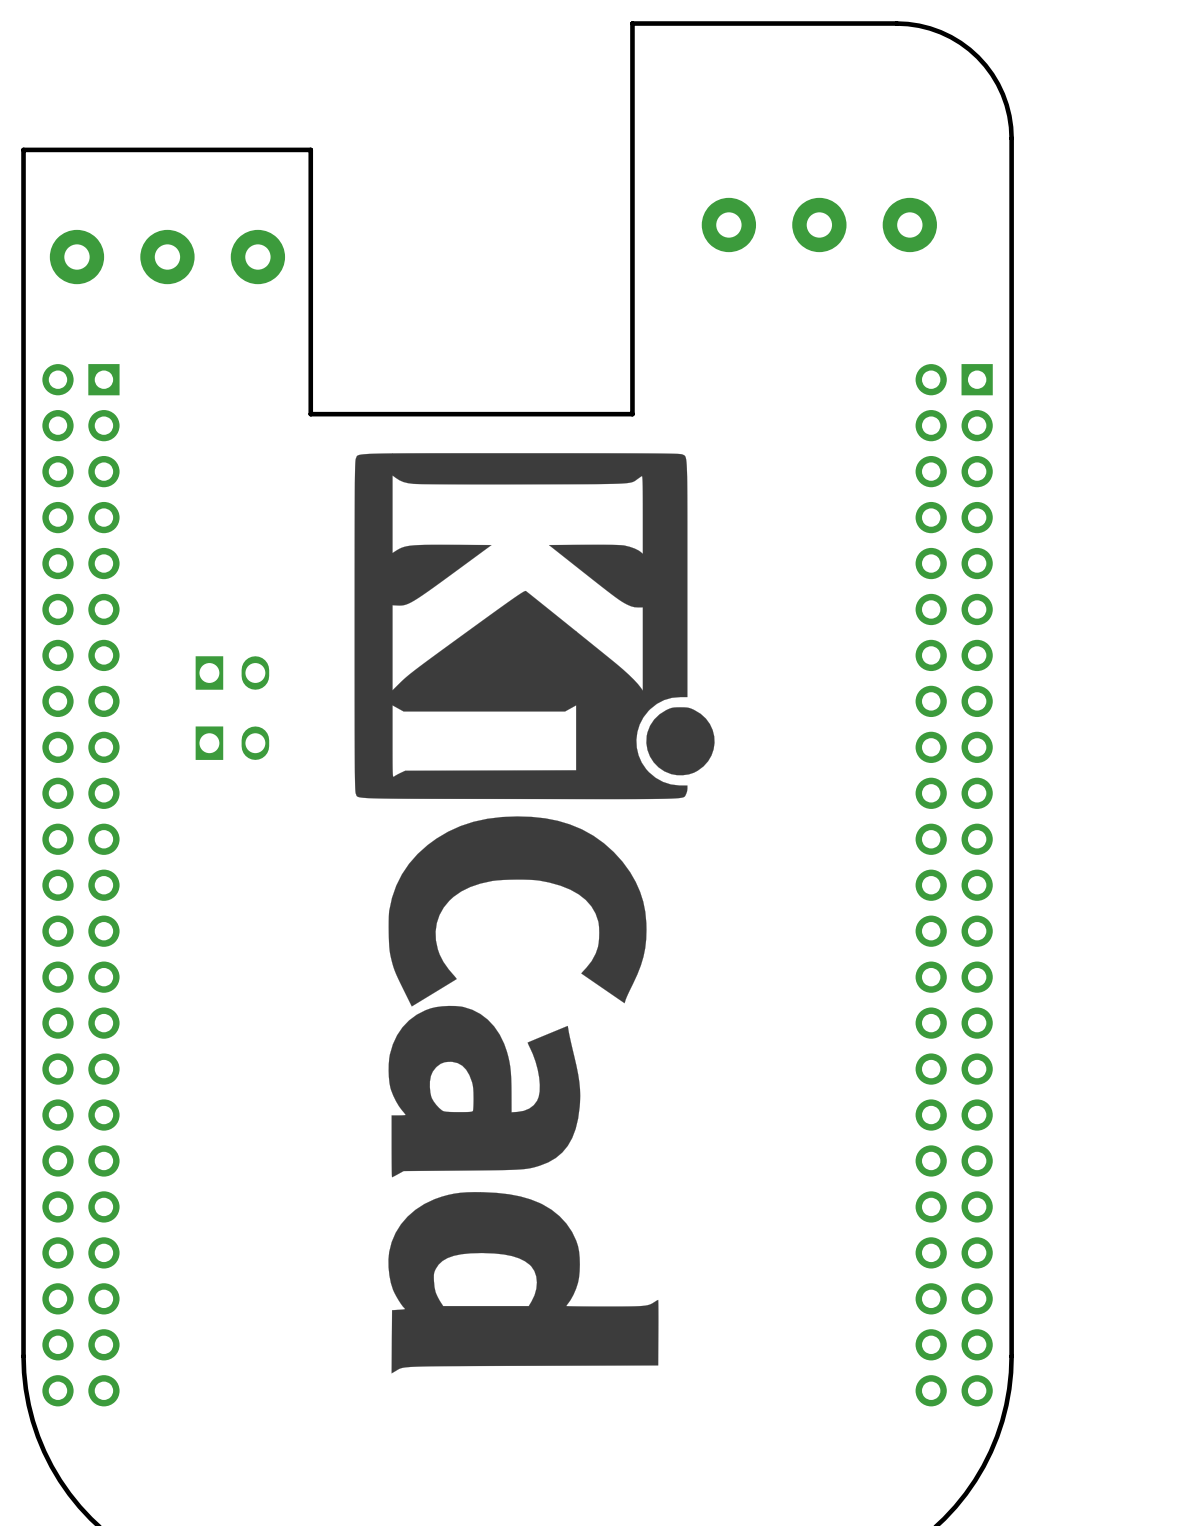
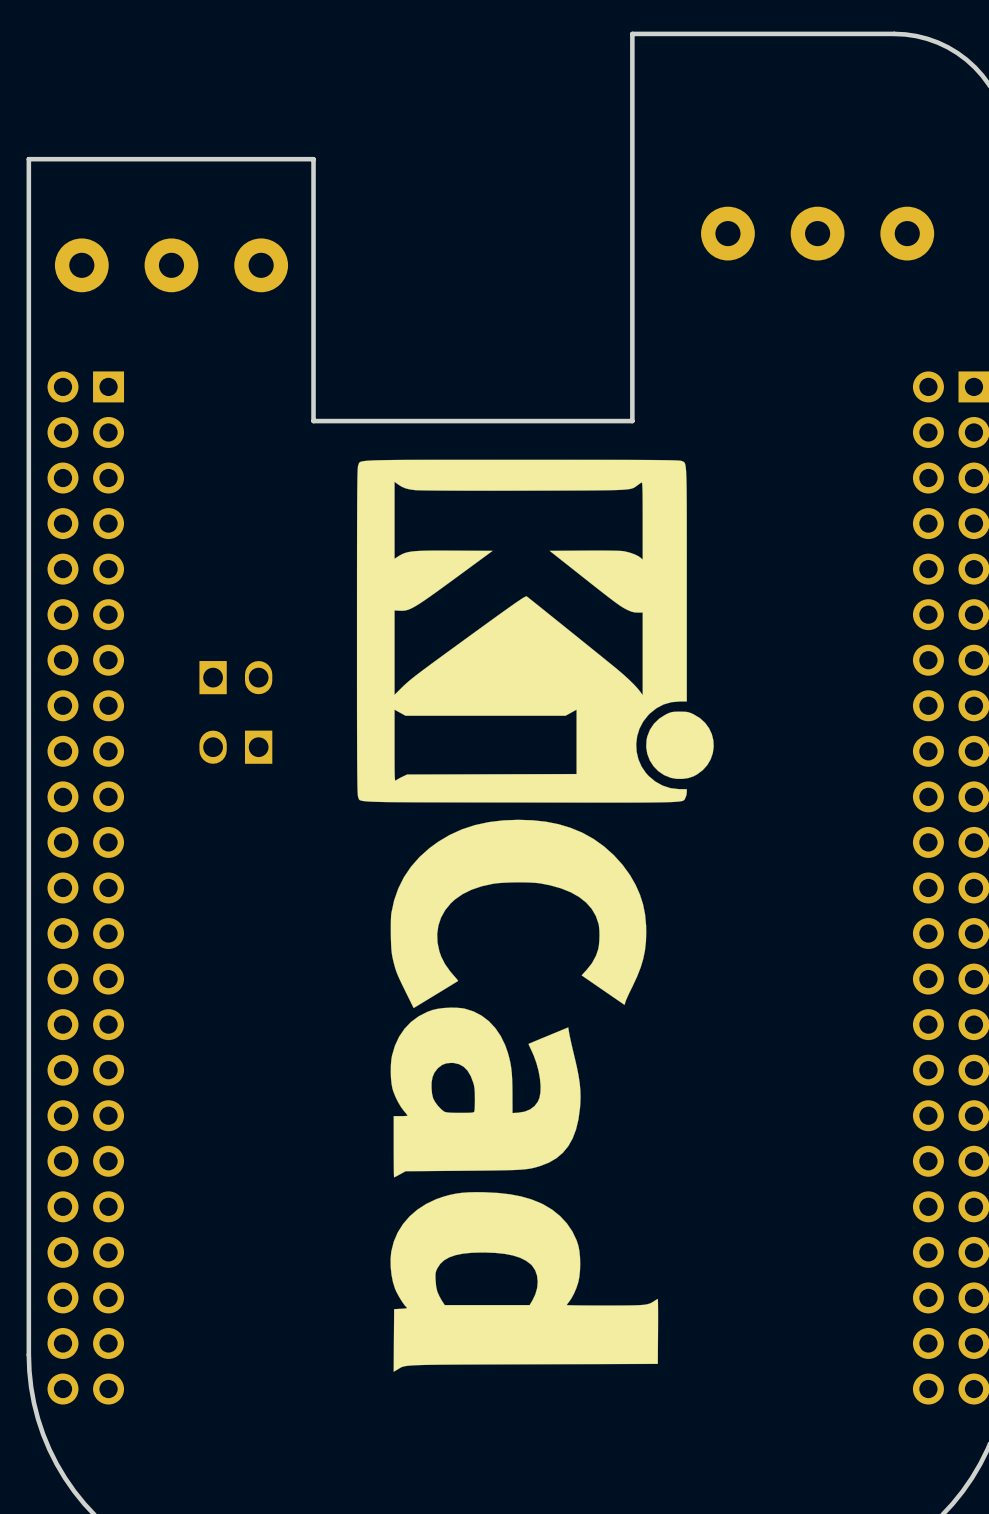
part rotation: 0° (232, 743) -> 180° (235, 747)

